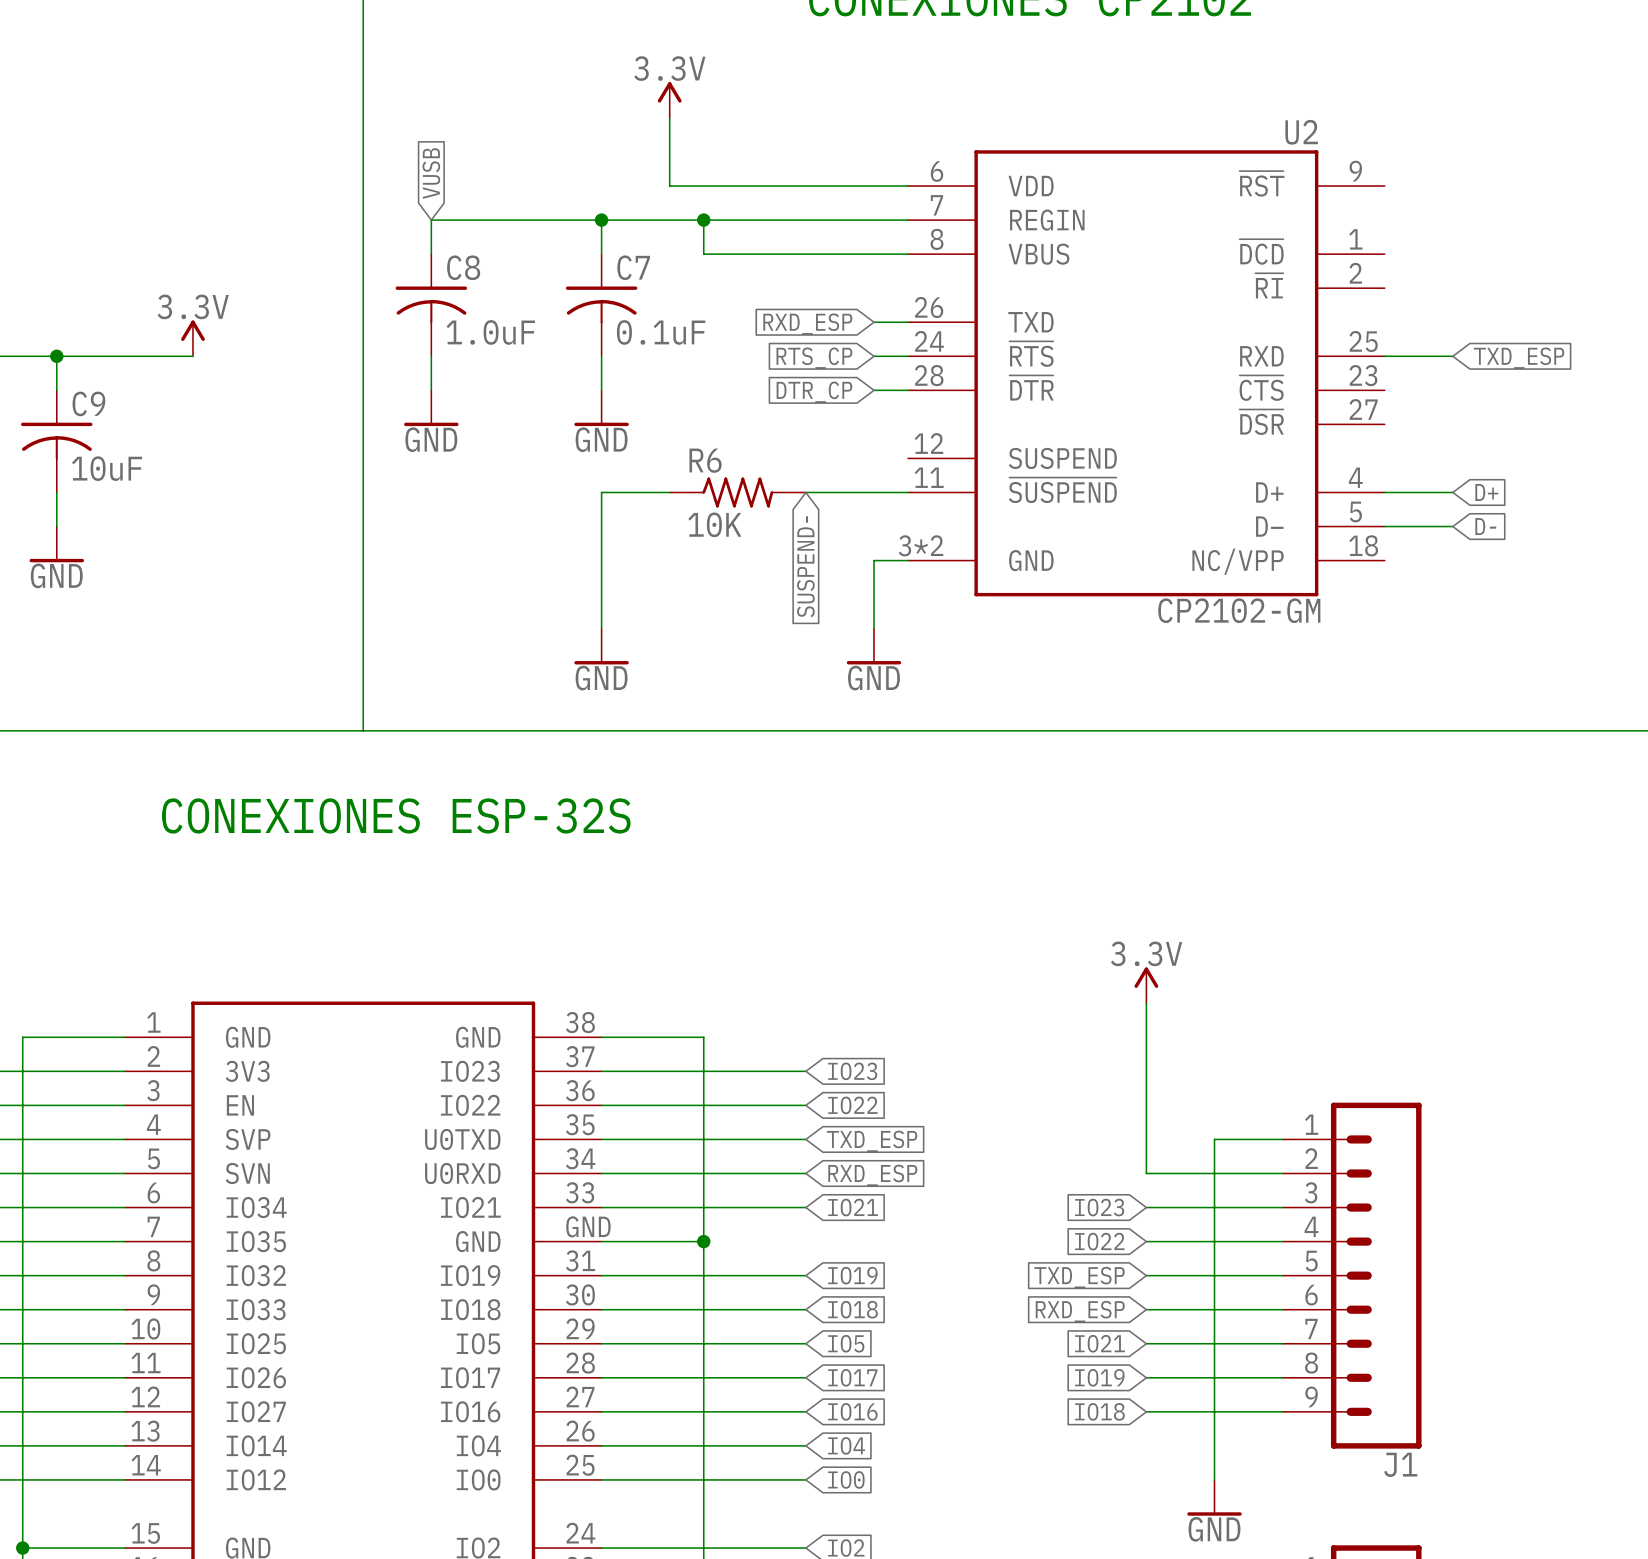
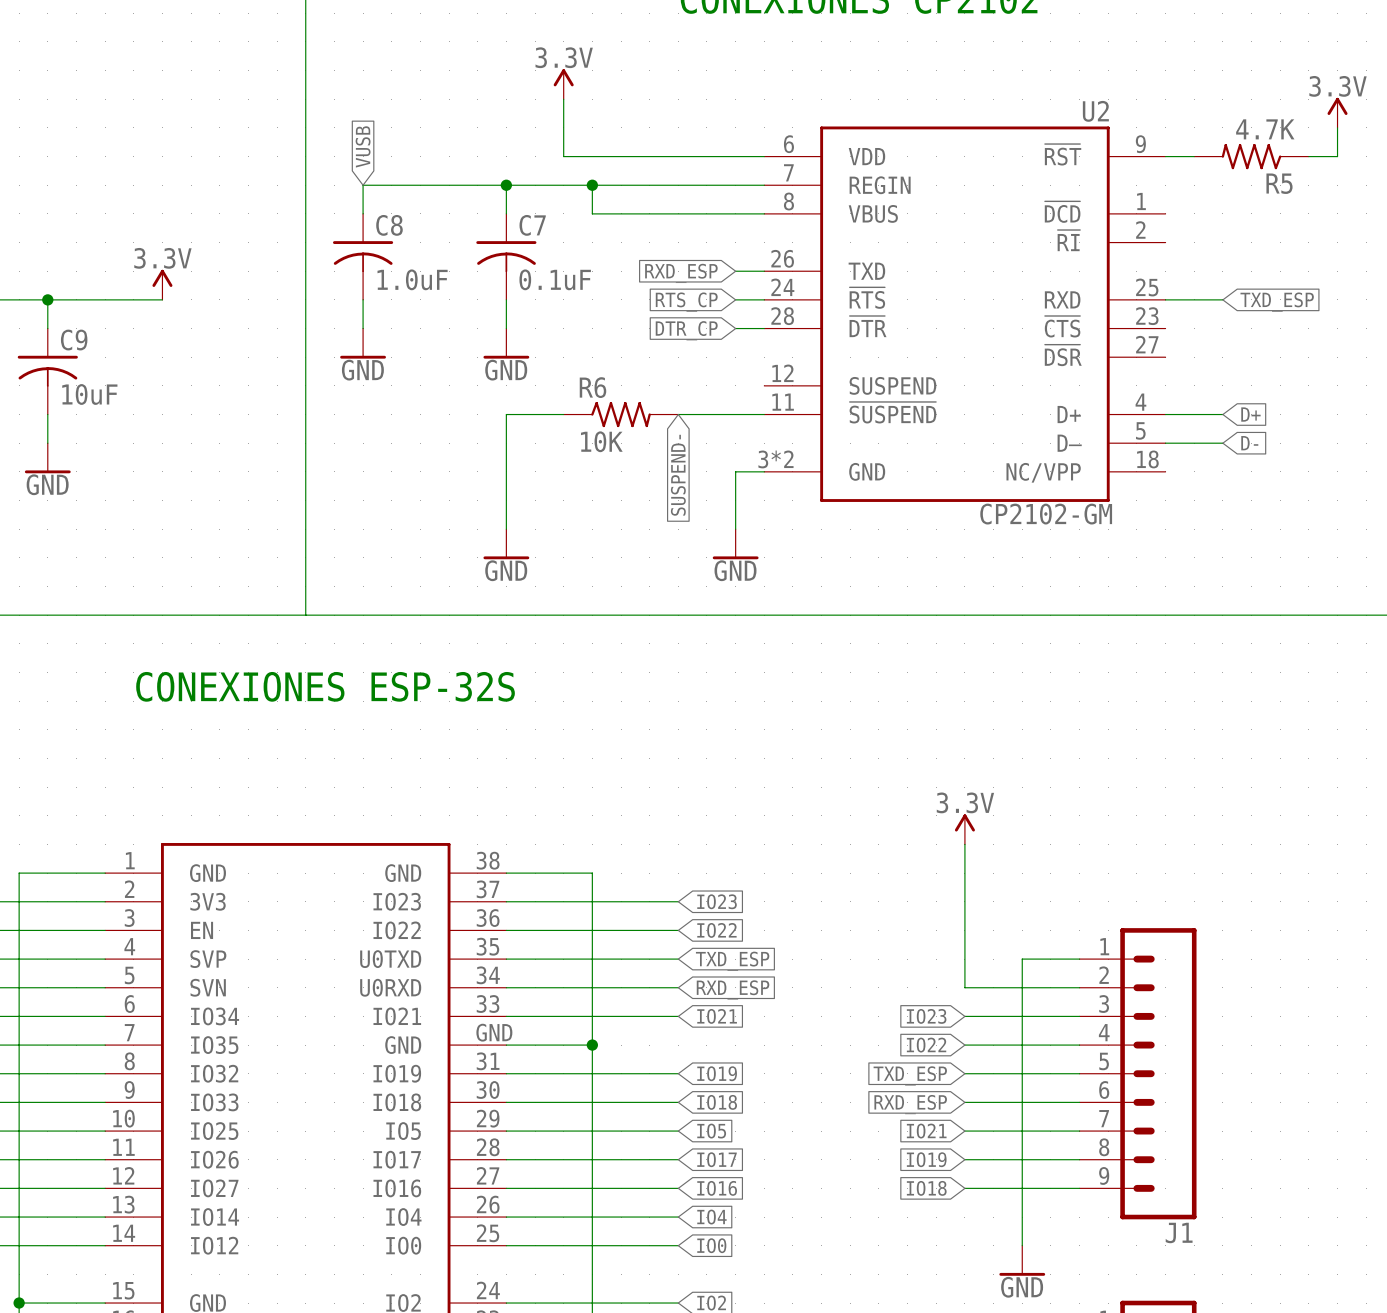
power symbol: none -> 3.3V (1337, 112)
wire: none -> (1337, 127) (1337, 156) (1308, 156)
wire: none -> (1165, 156) (1194, 156)
R5: none -> 4.7K (1251, 156)

